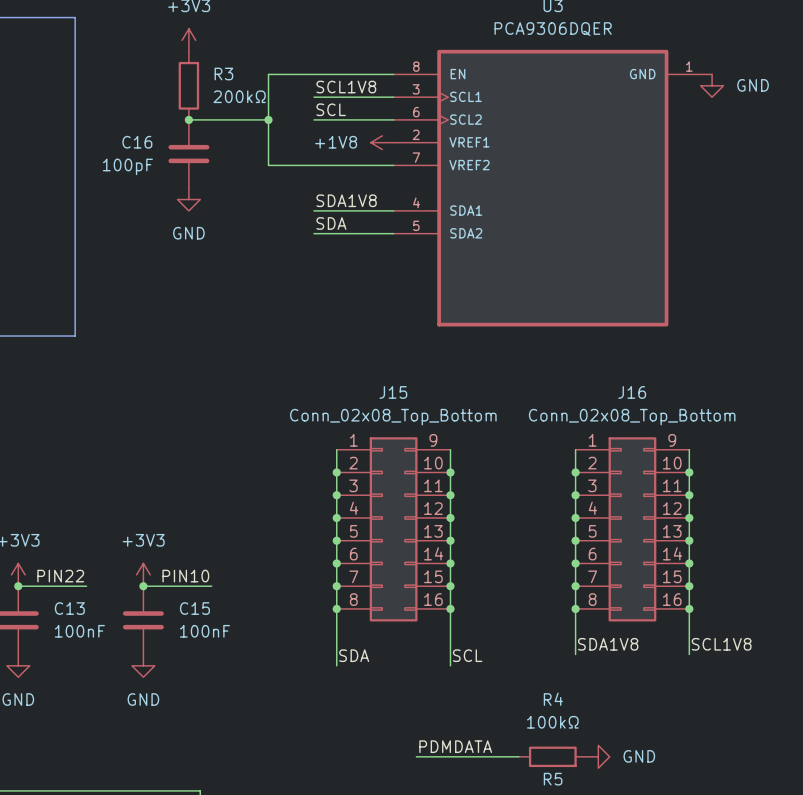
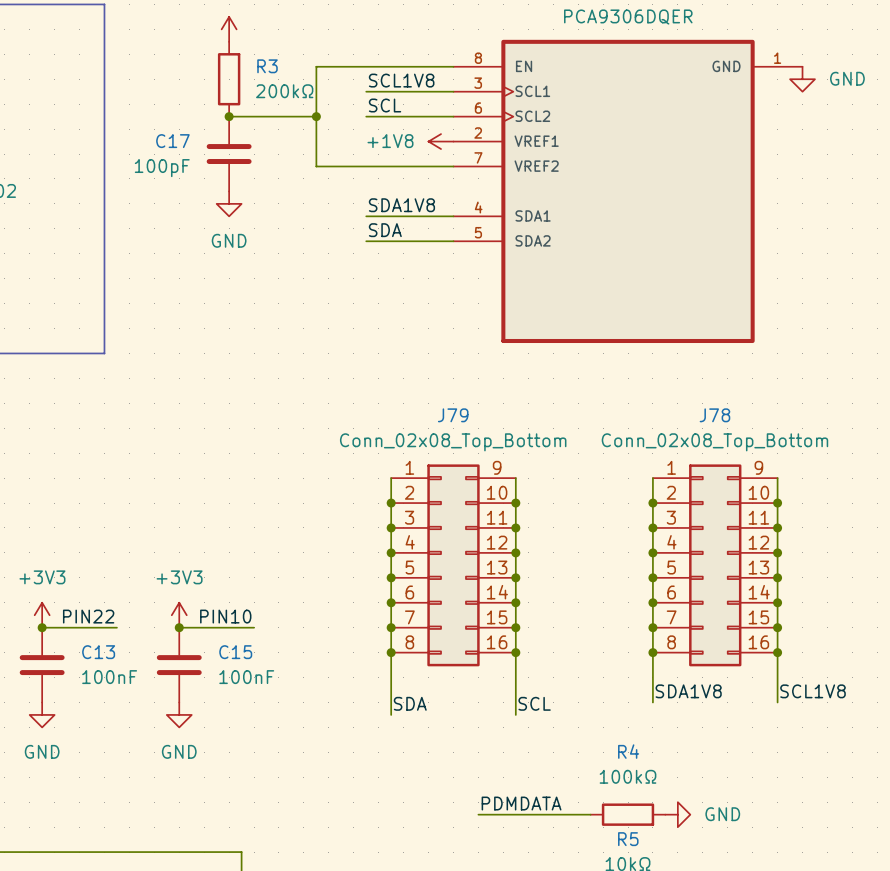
C16 name: C16 (137, 142) -> C17 (172, 141)
J15 name: J15 (393, 392) -> J79 (453, 415)
J16 name: J16 (632, 392) -> J78 (714, 415)

